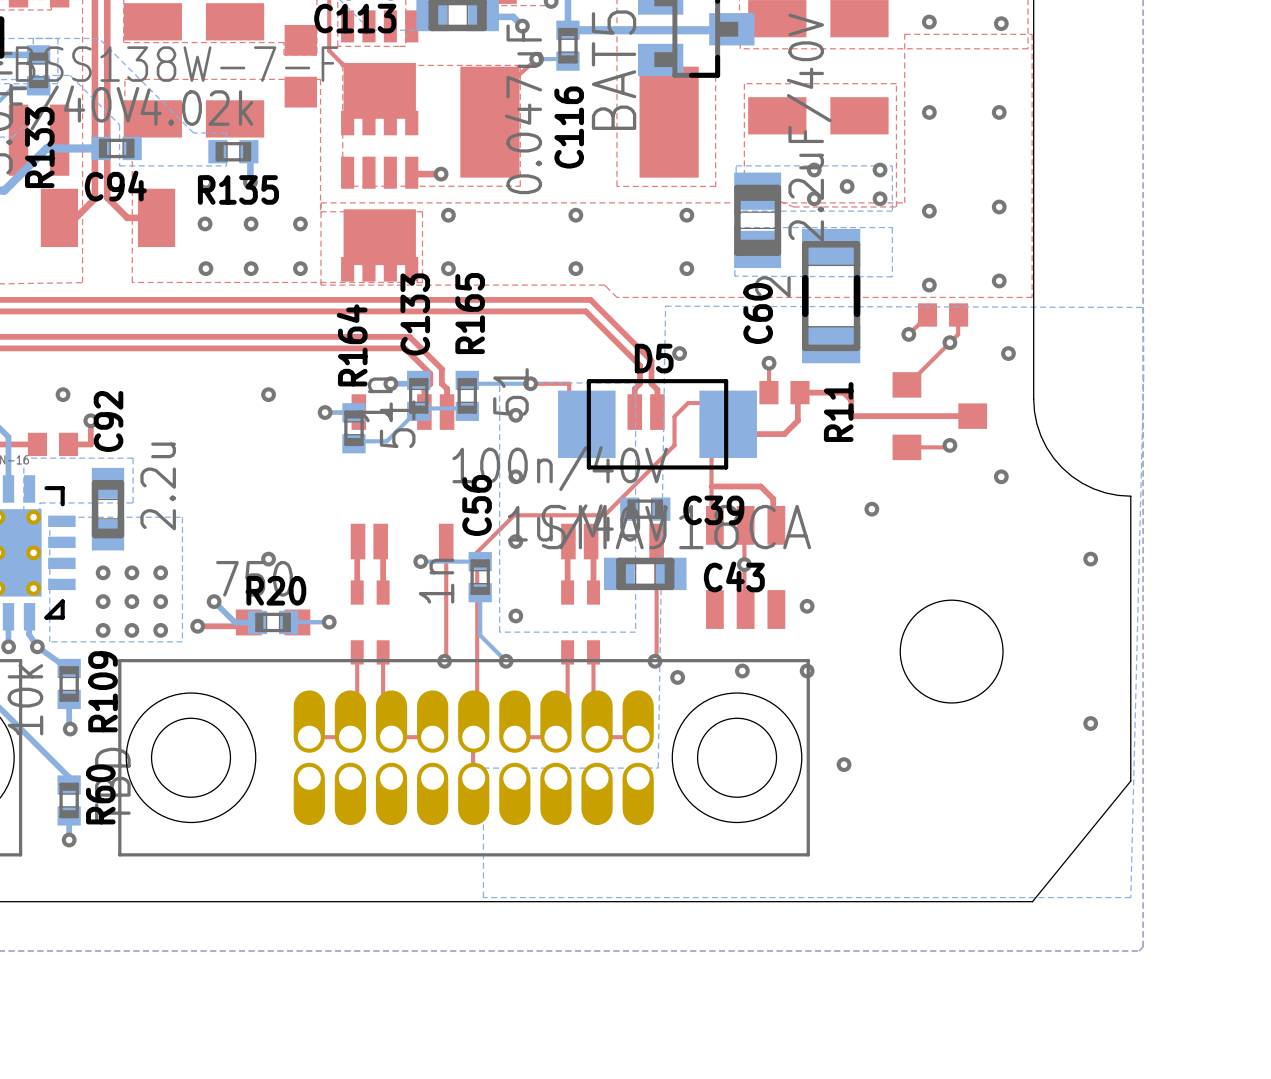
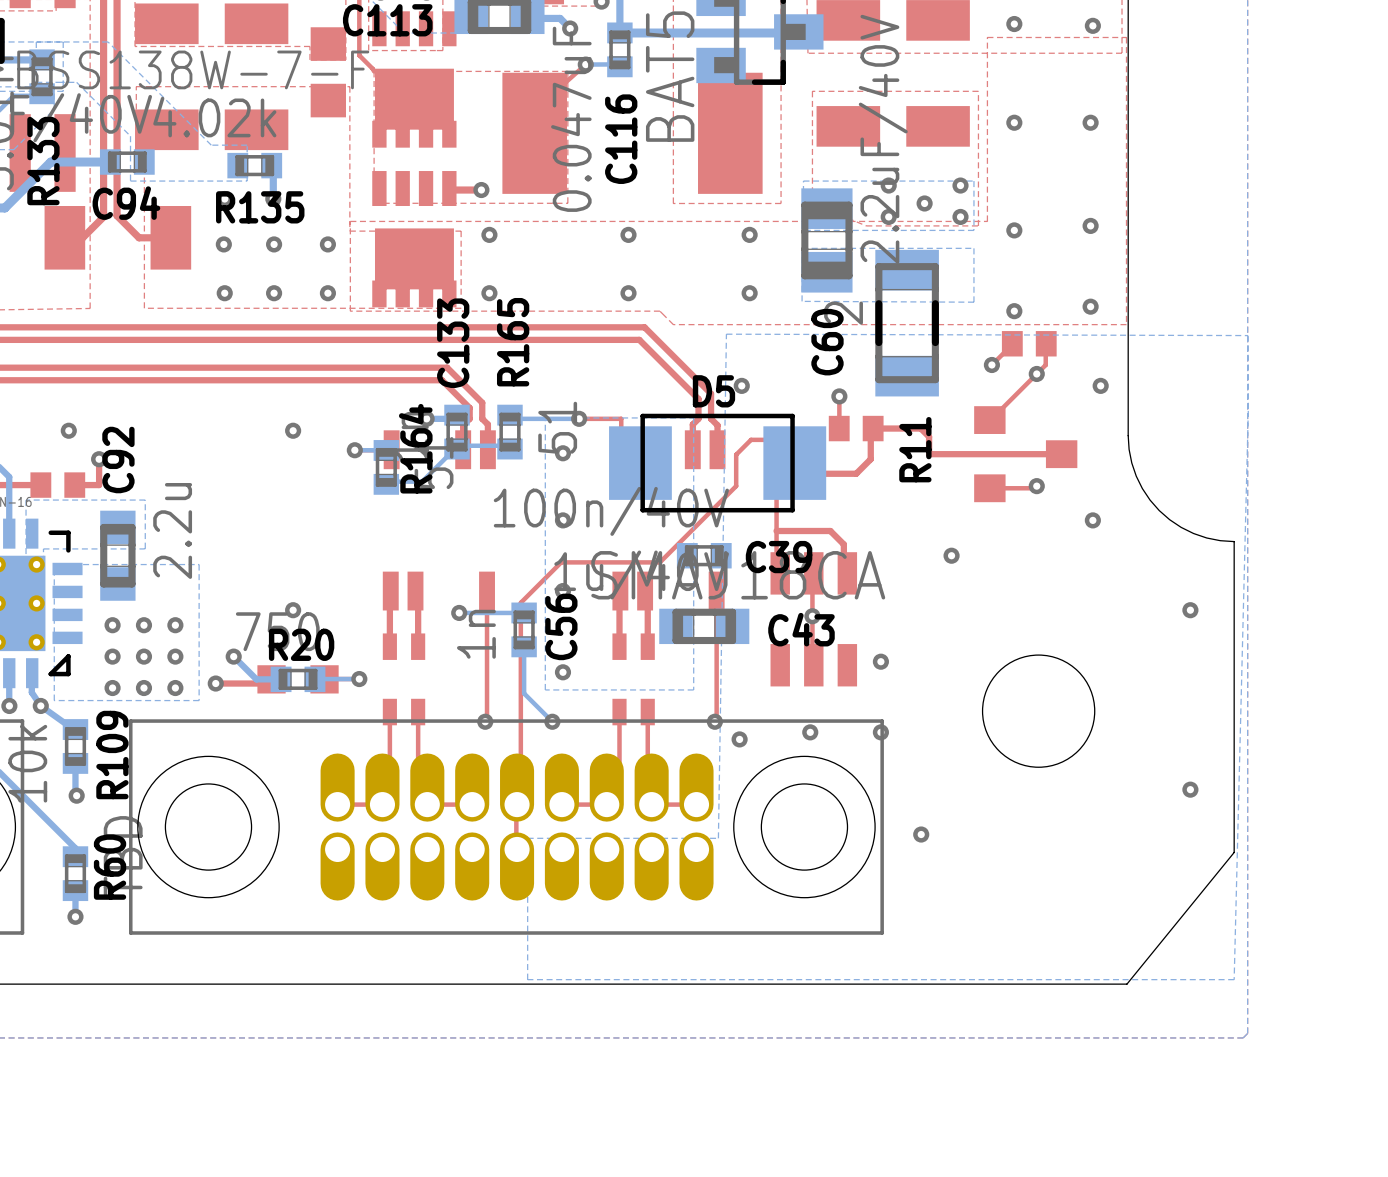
R164 name position: R164 (352, 345) -> R164 (415, 448)
C56 name position: C56 (477, 505) -> C56 (561, 626)

